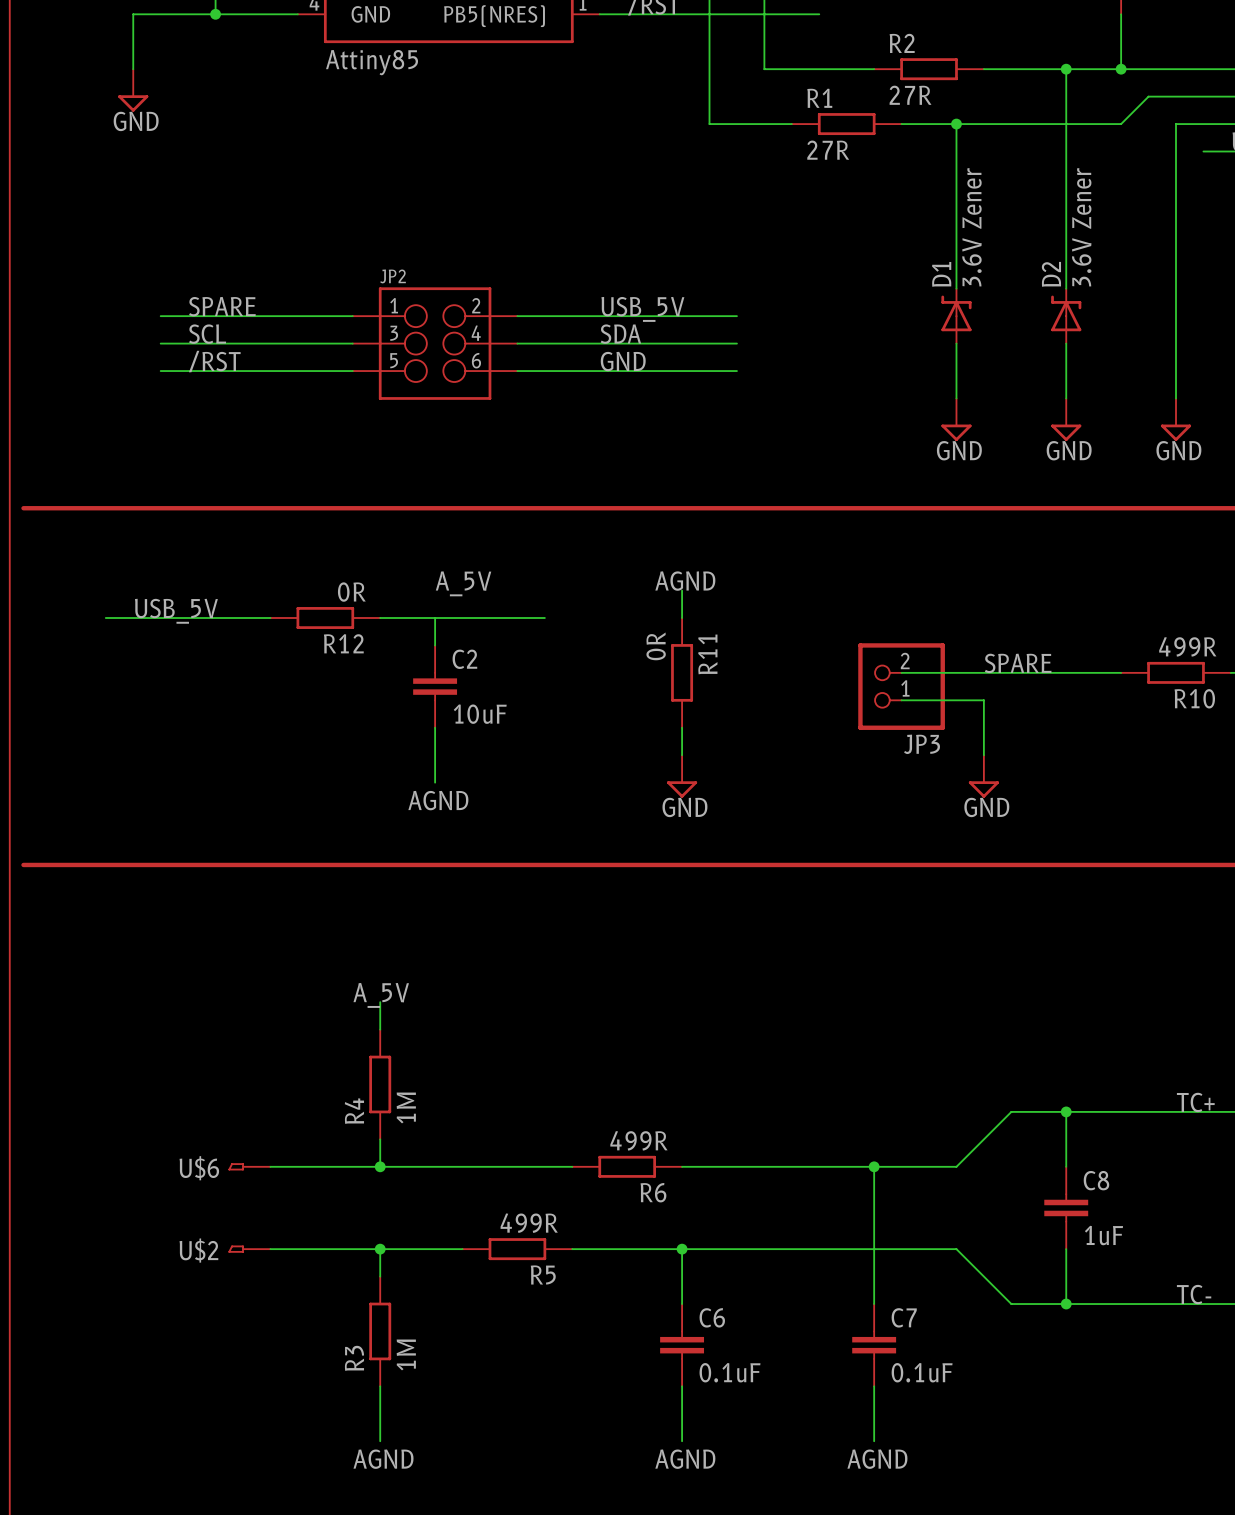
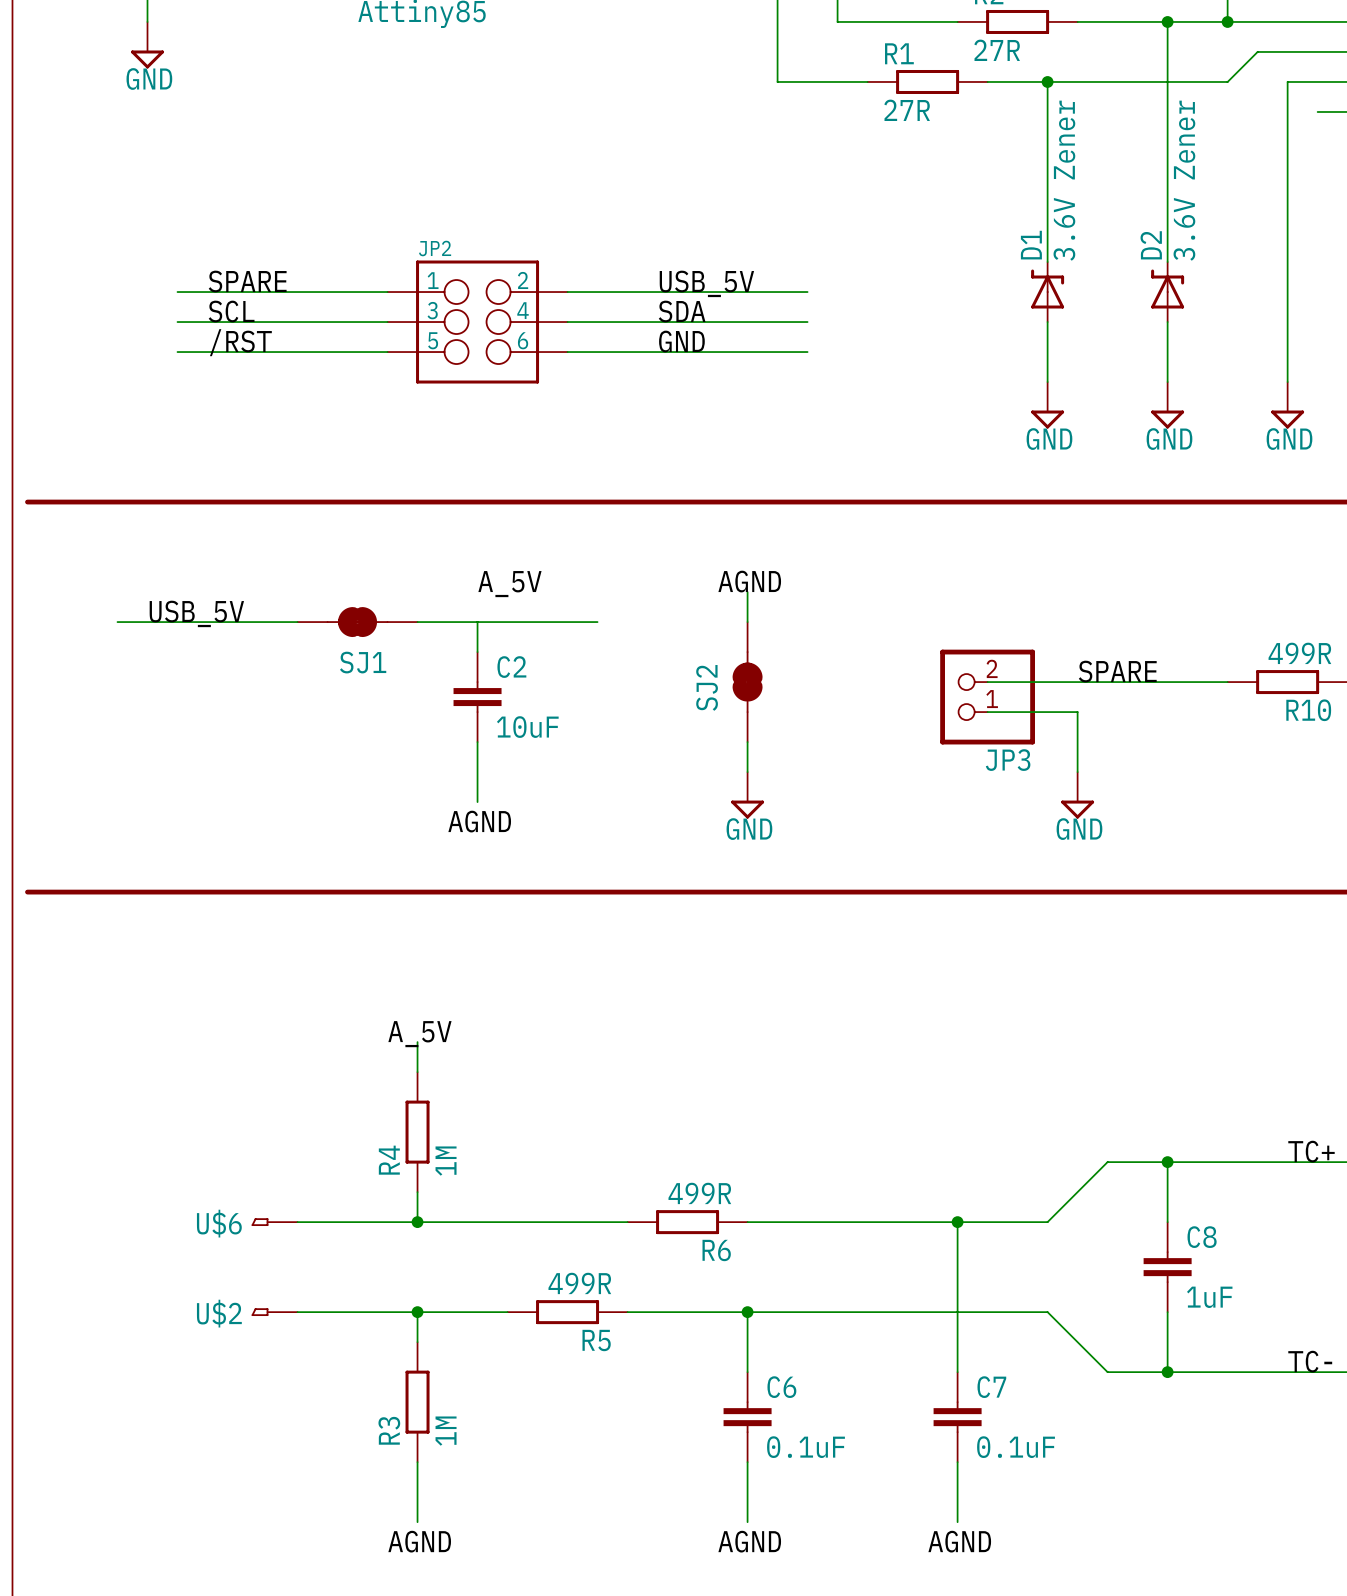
R12: 0R (325, 618) -> none
SJ1: none -> (357, 622)
R11: 0R (682, 672) -> none
SJ2: none -> (747, 682)

